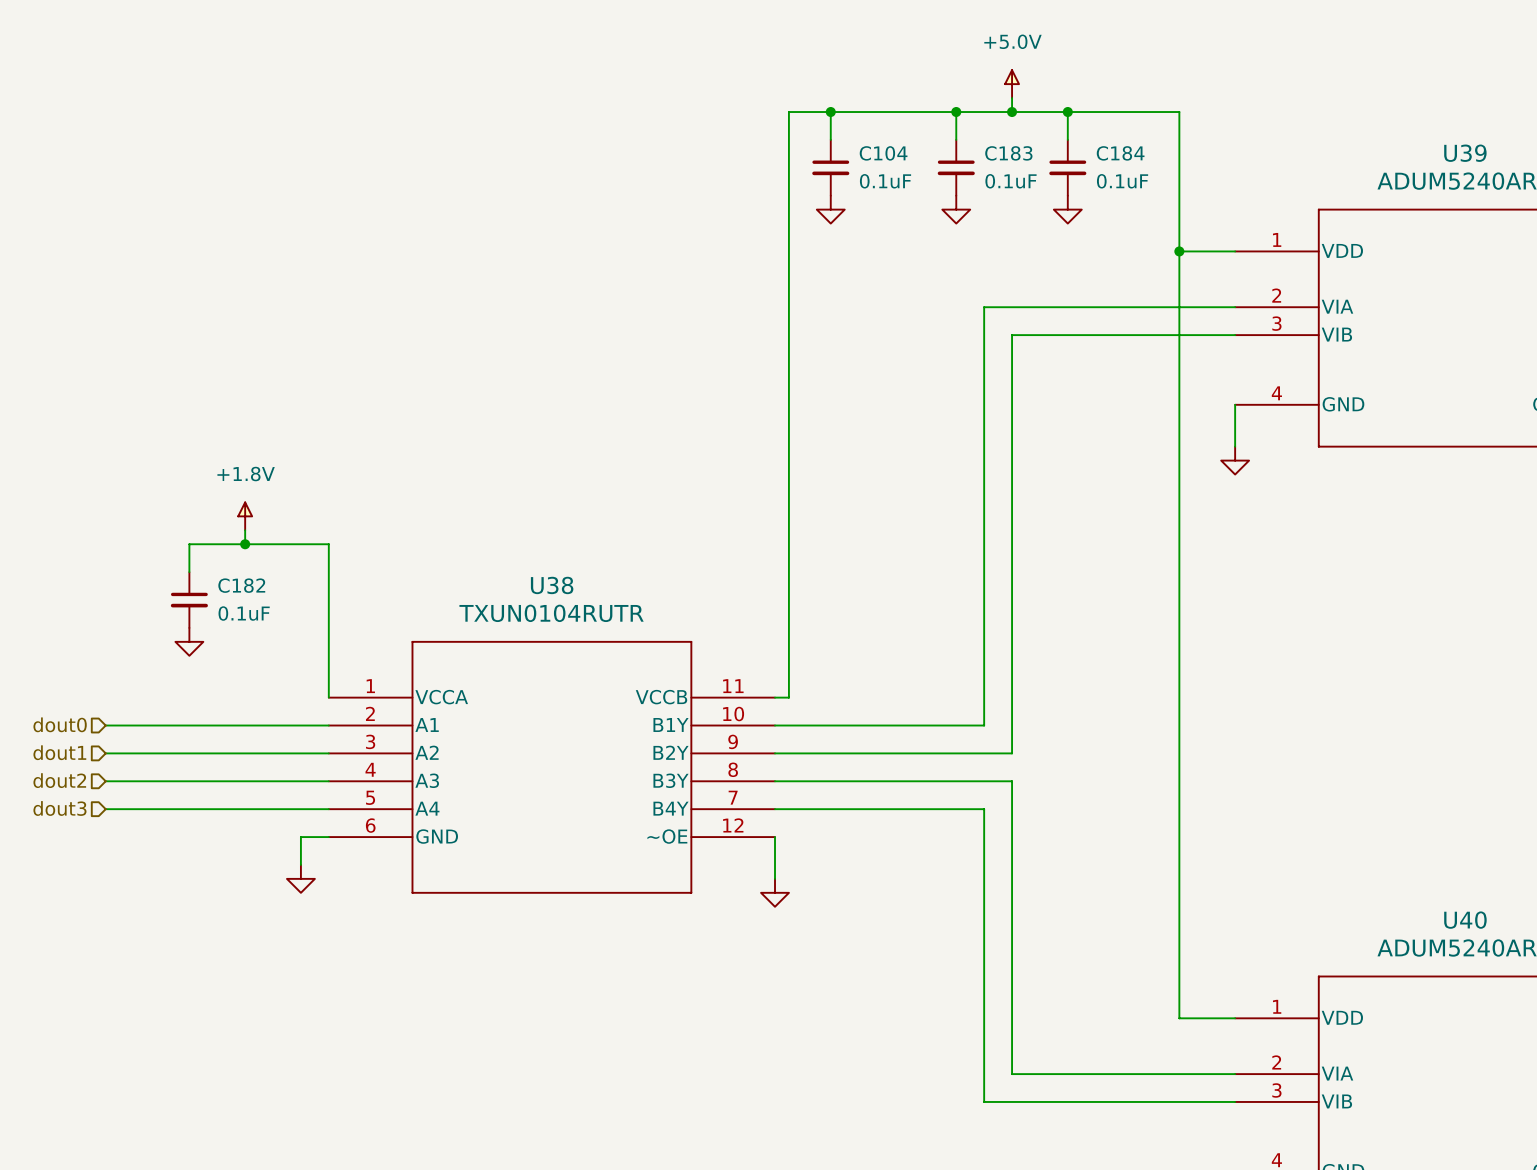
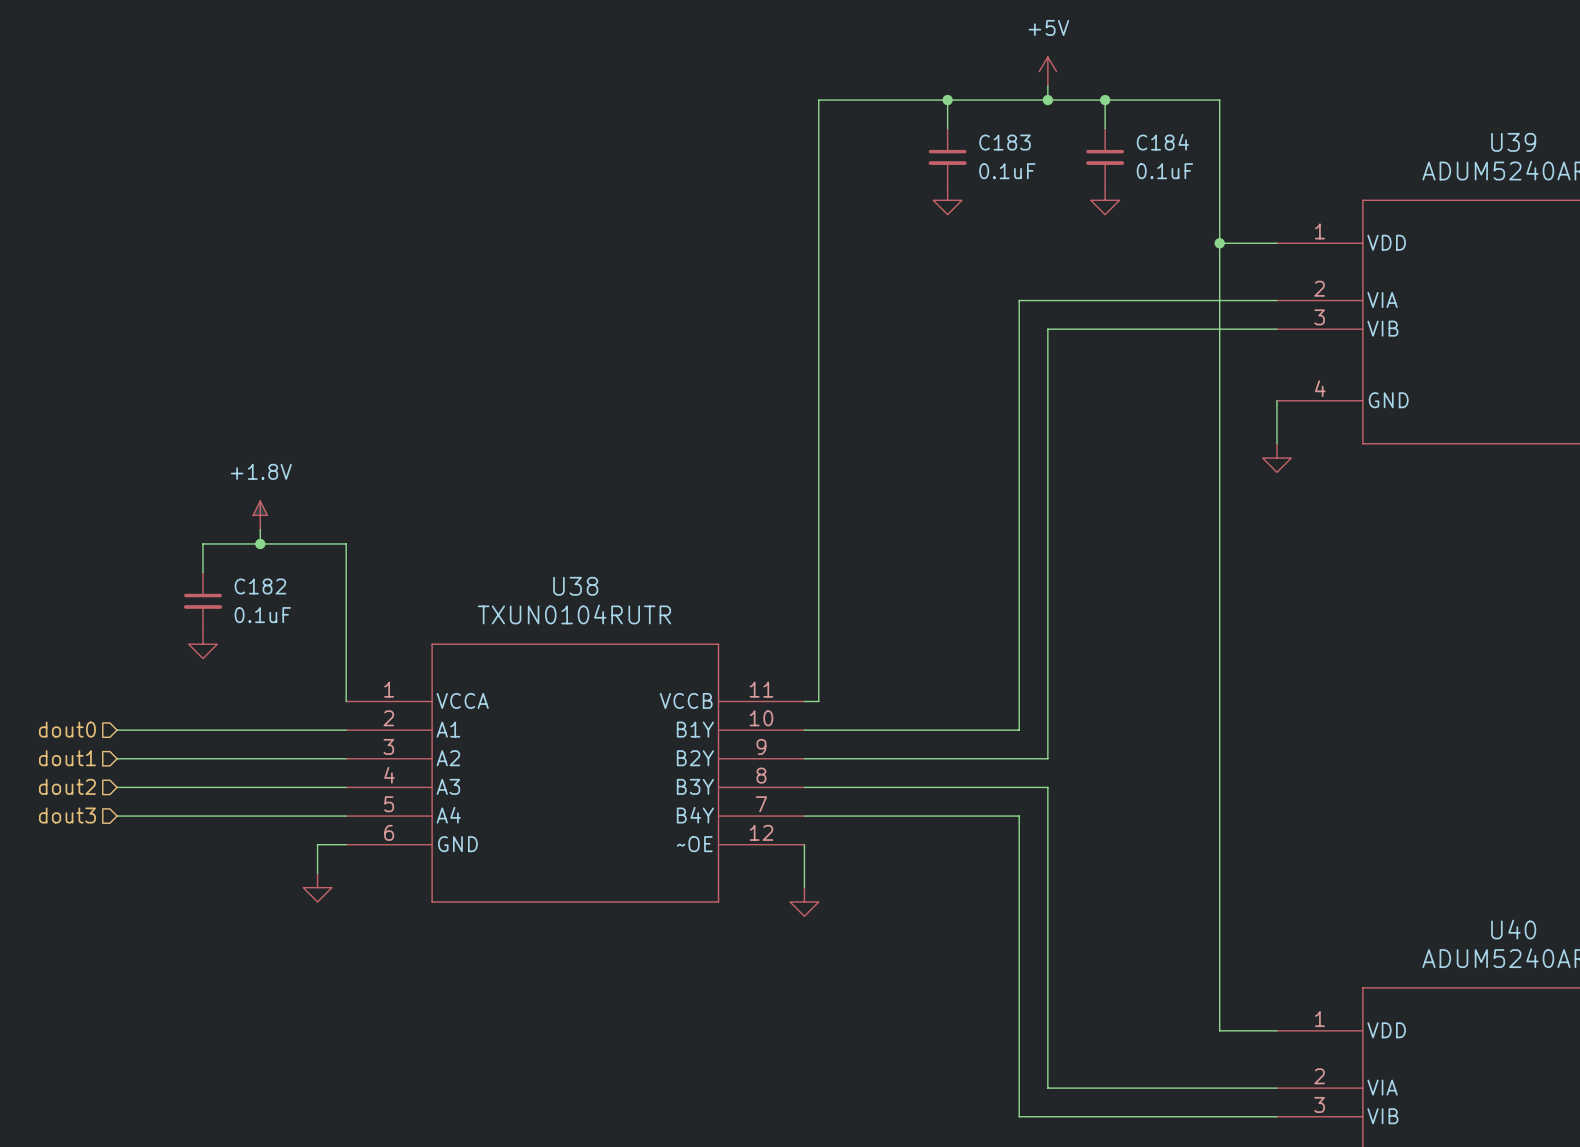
power symbol: +5.0V (1012, 84) -> +5V (1047, 71)
wire: (830, 112) (830, 139) -> none
junction: (830, 112) -> none
junction: none -> (947, 100)
wire: (956, 112) (956, 139) -> (947, 100) (947, 128)
junction: (956, 112) -> none
C104: 0.1uF (830, 167) -> none
C183 position: (956, 167) -> (947, 157)
power symbol: (830, 209) -> none
power symbol: none -> (947, 200)
power symbol: (956, 209) -> none

